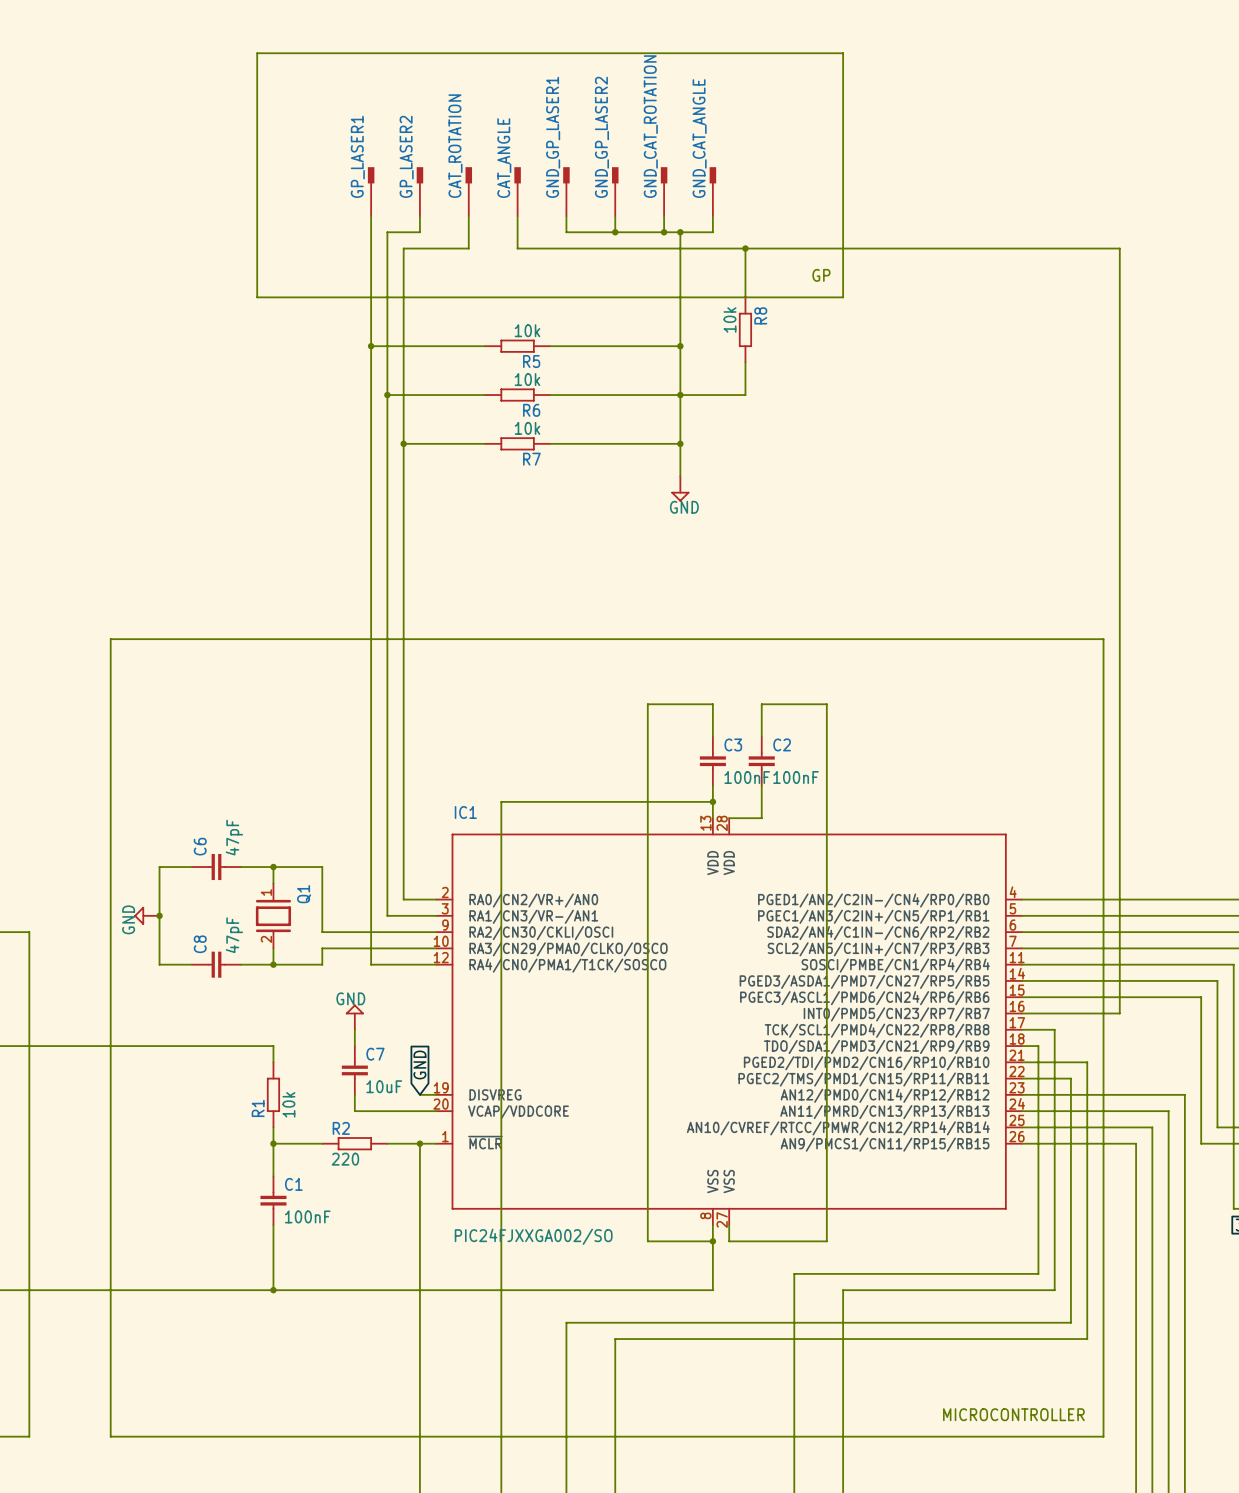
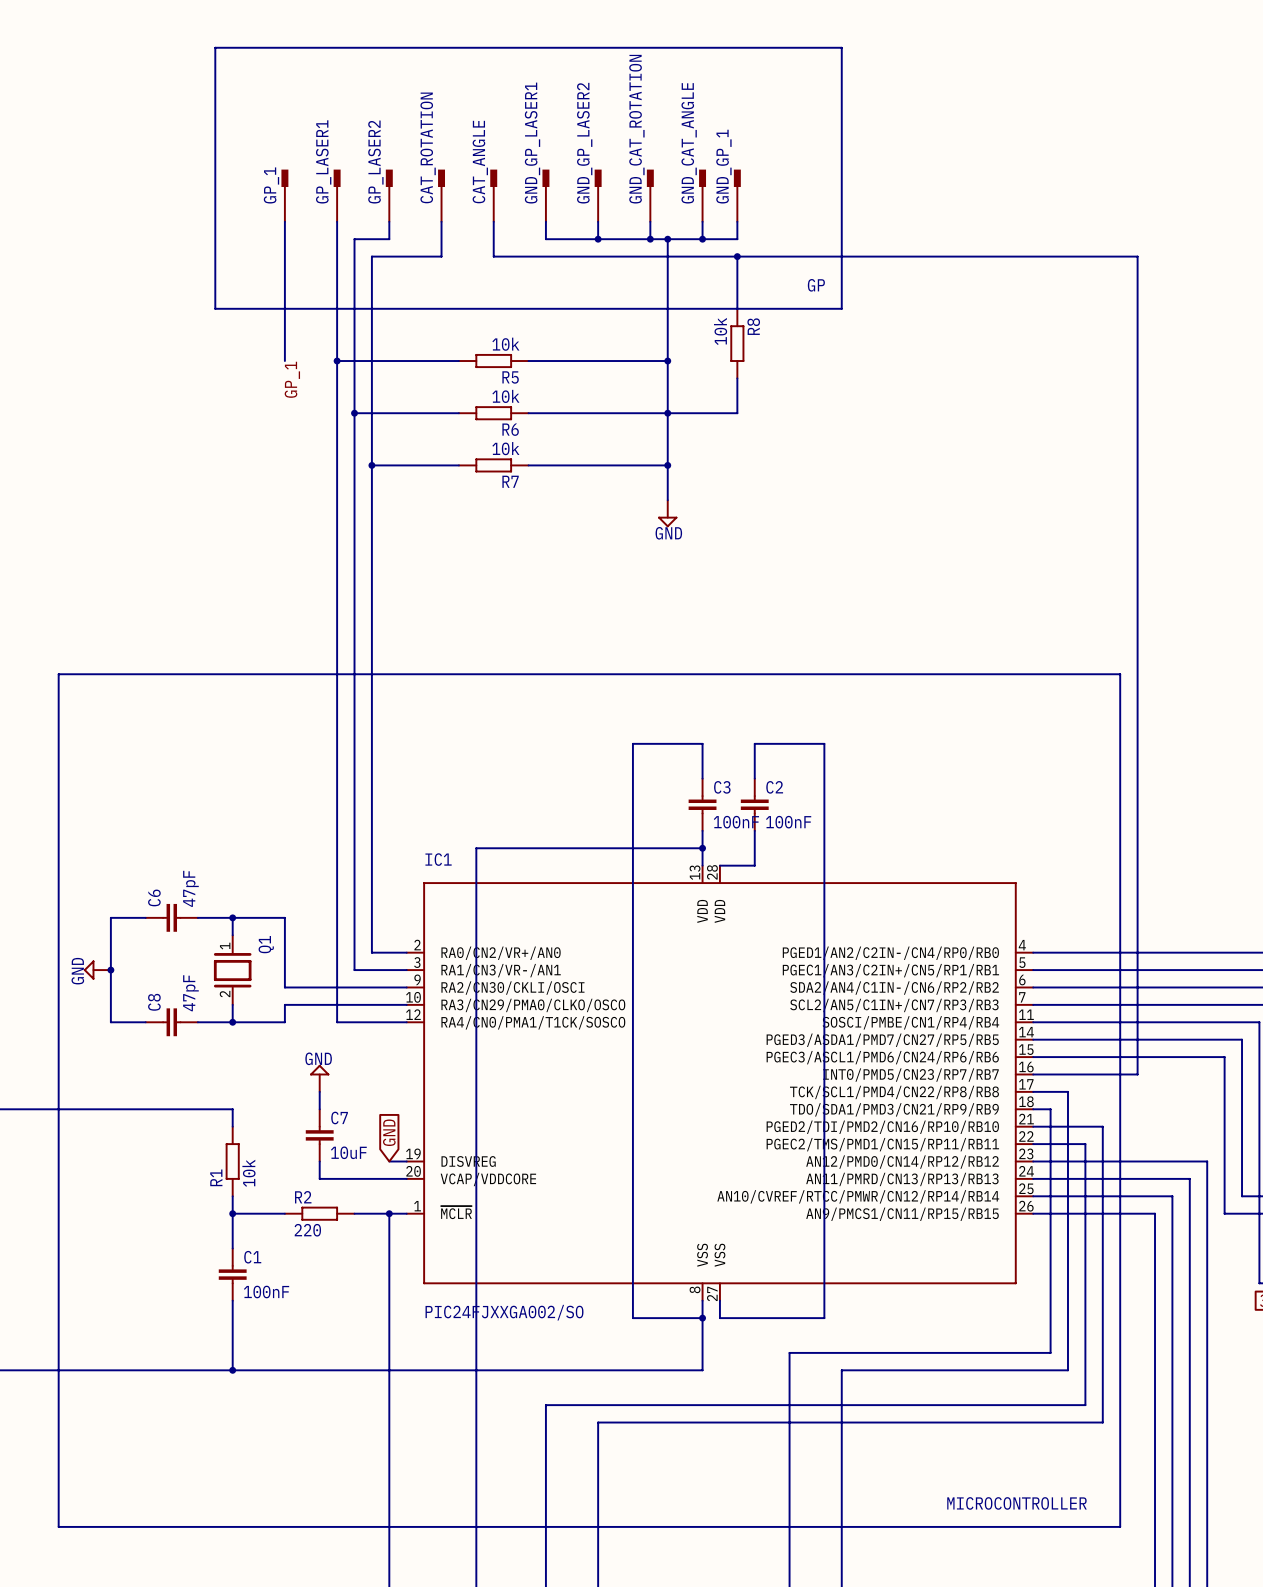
GP_1: none -> (284, 195)
GND_GP_1: none -> (737, 195)
wire: none -> (284, 221) (284, 361)
wire: none -> (737, 221) (737, 239) (702, 239)
junction: none -> (702, 239)
label: none -> GP_1 (292, 379)

